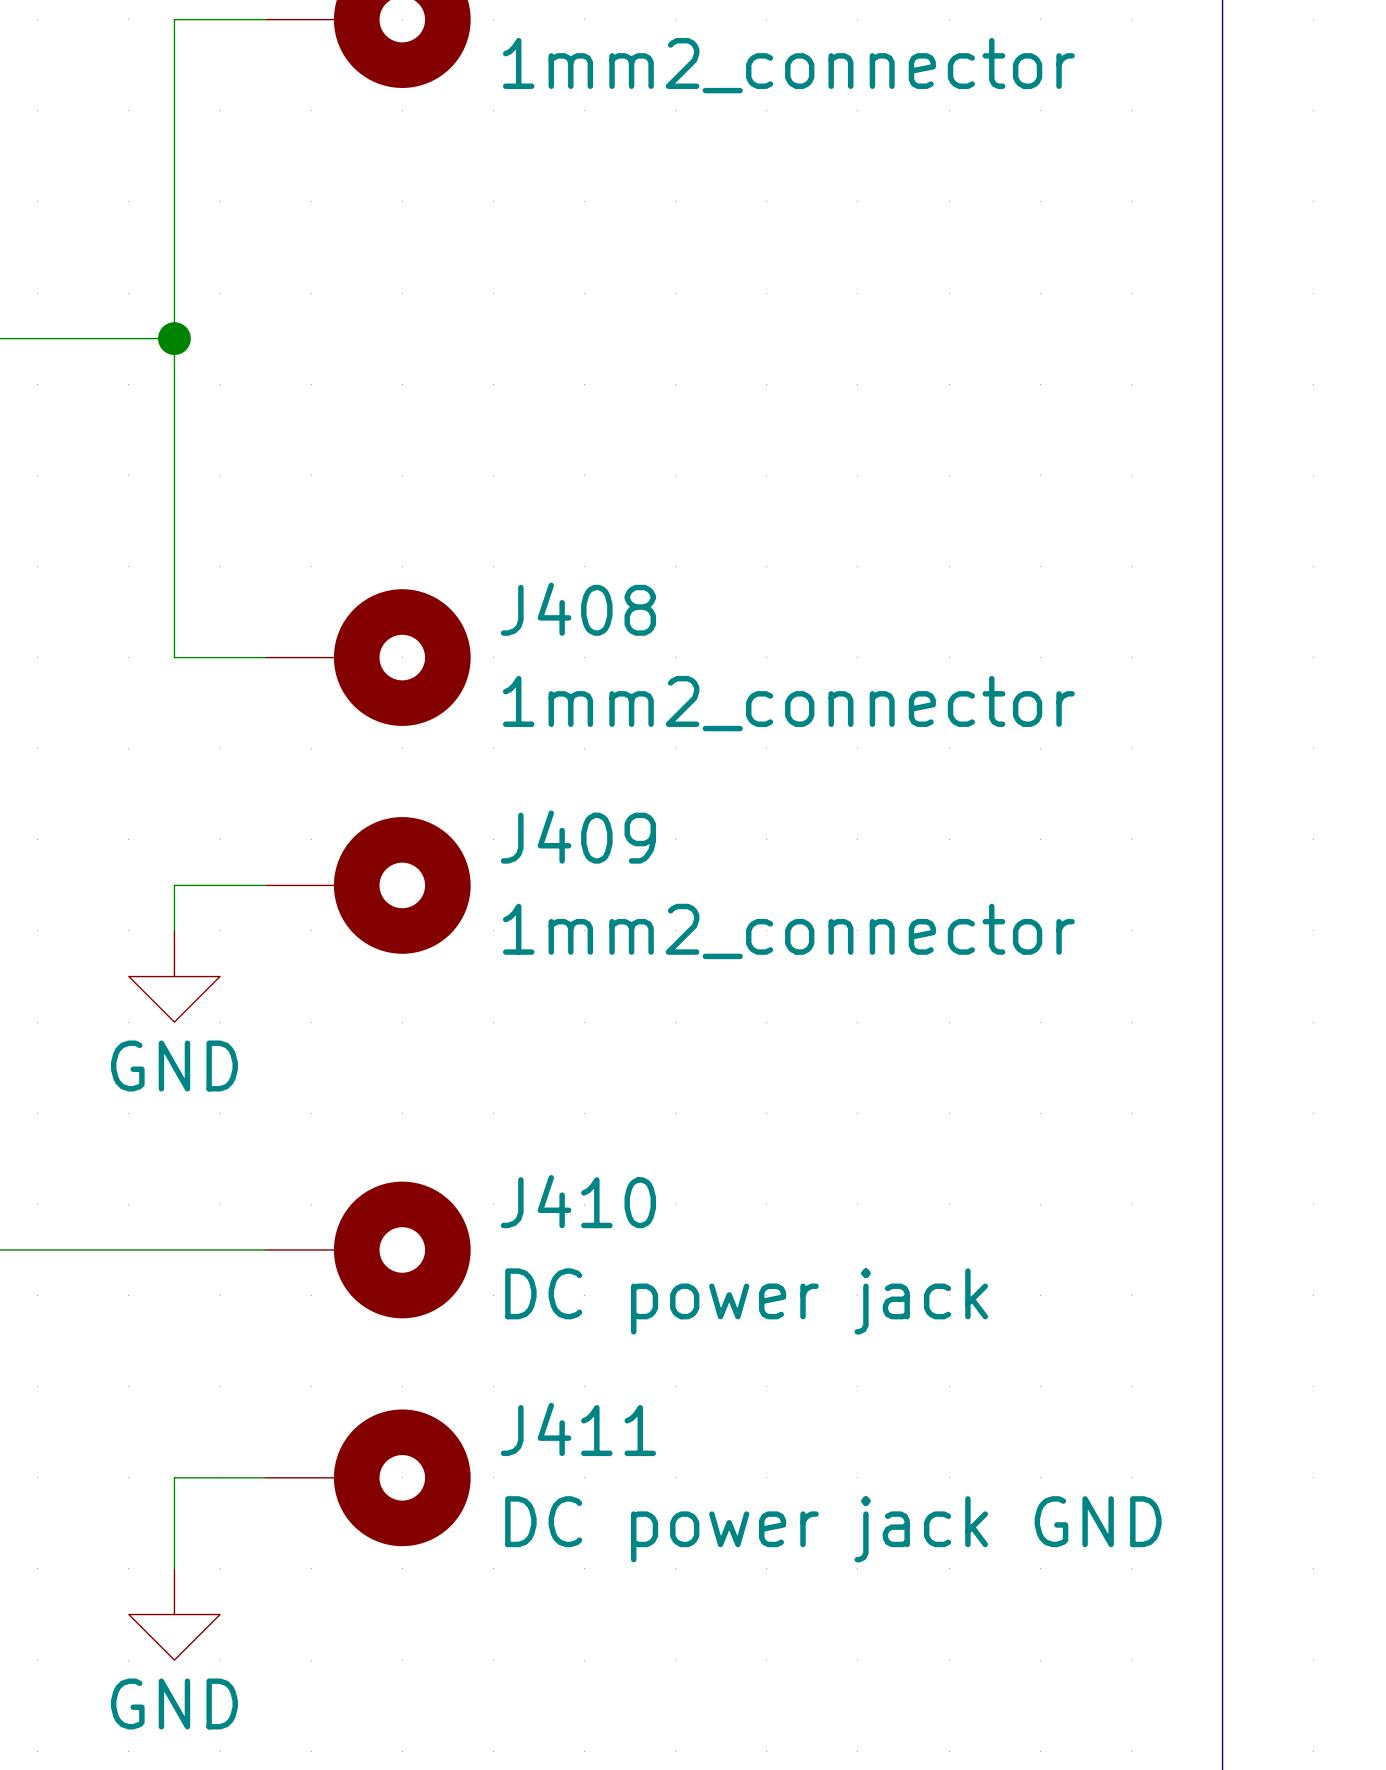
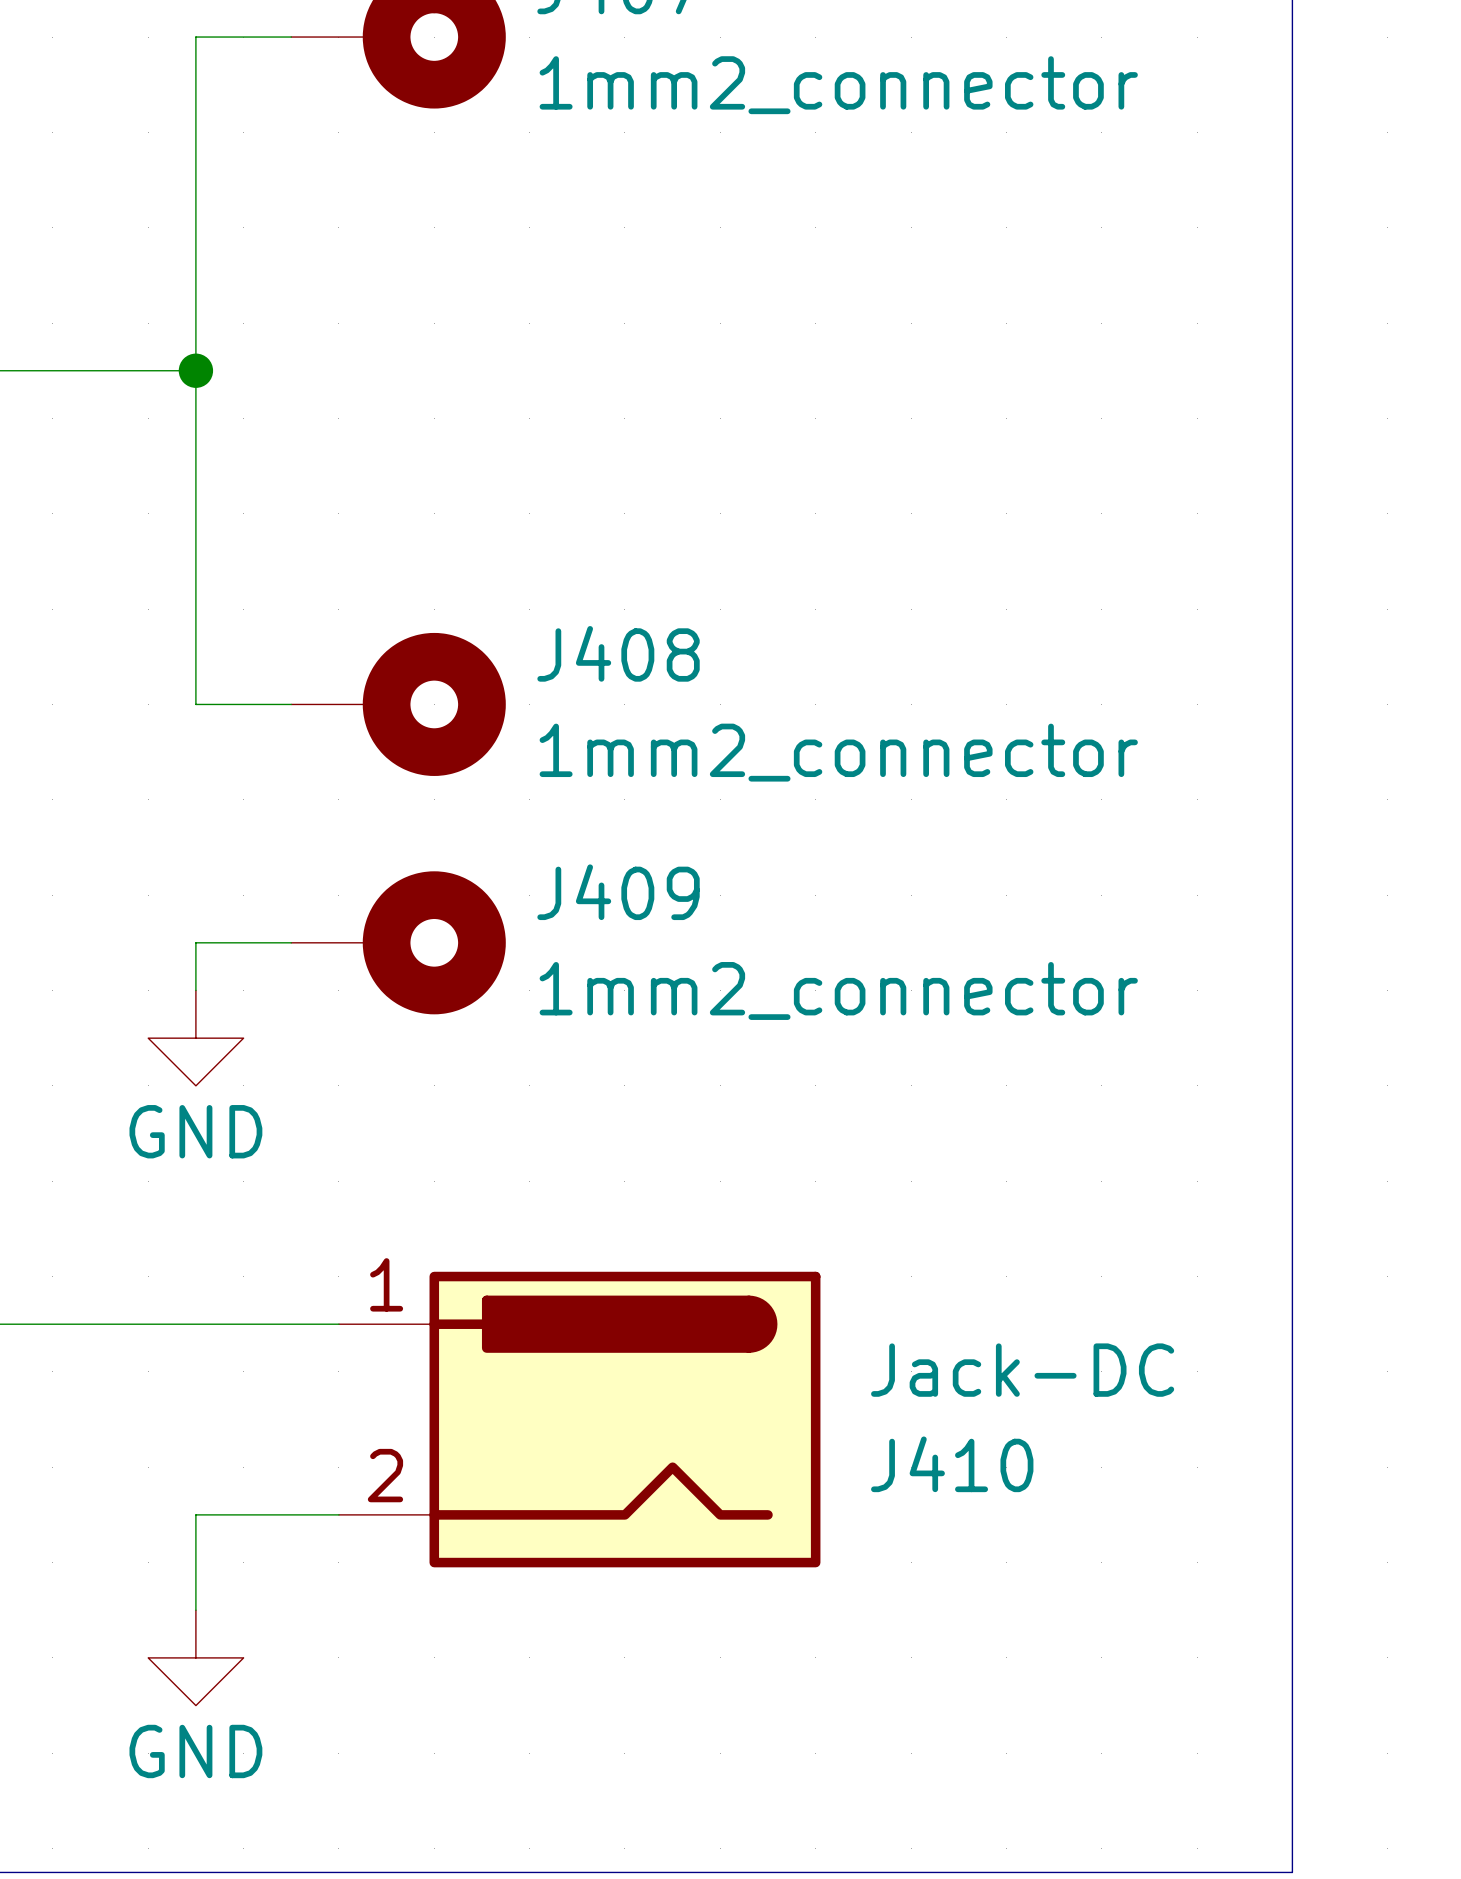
J410 symbol: [265, 1181, 471, 1319] -> [338, 1271, 821, 1568]
J410 name position: J410 (578, 1201) -> J410 (952, 1464)
J410 value: DC power jack (746, 1301) -> Jack-DC (1022, 1370)
wire: (174, 1477) (265, 1477) -> (195, 1562) (195, 1514) (338, 1514)
J411: DC power jack GND (368, 1477) -> none
power symbol position: GND (174, 1614) -> GND (195, 1657)

